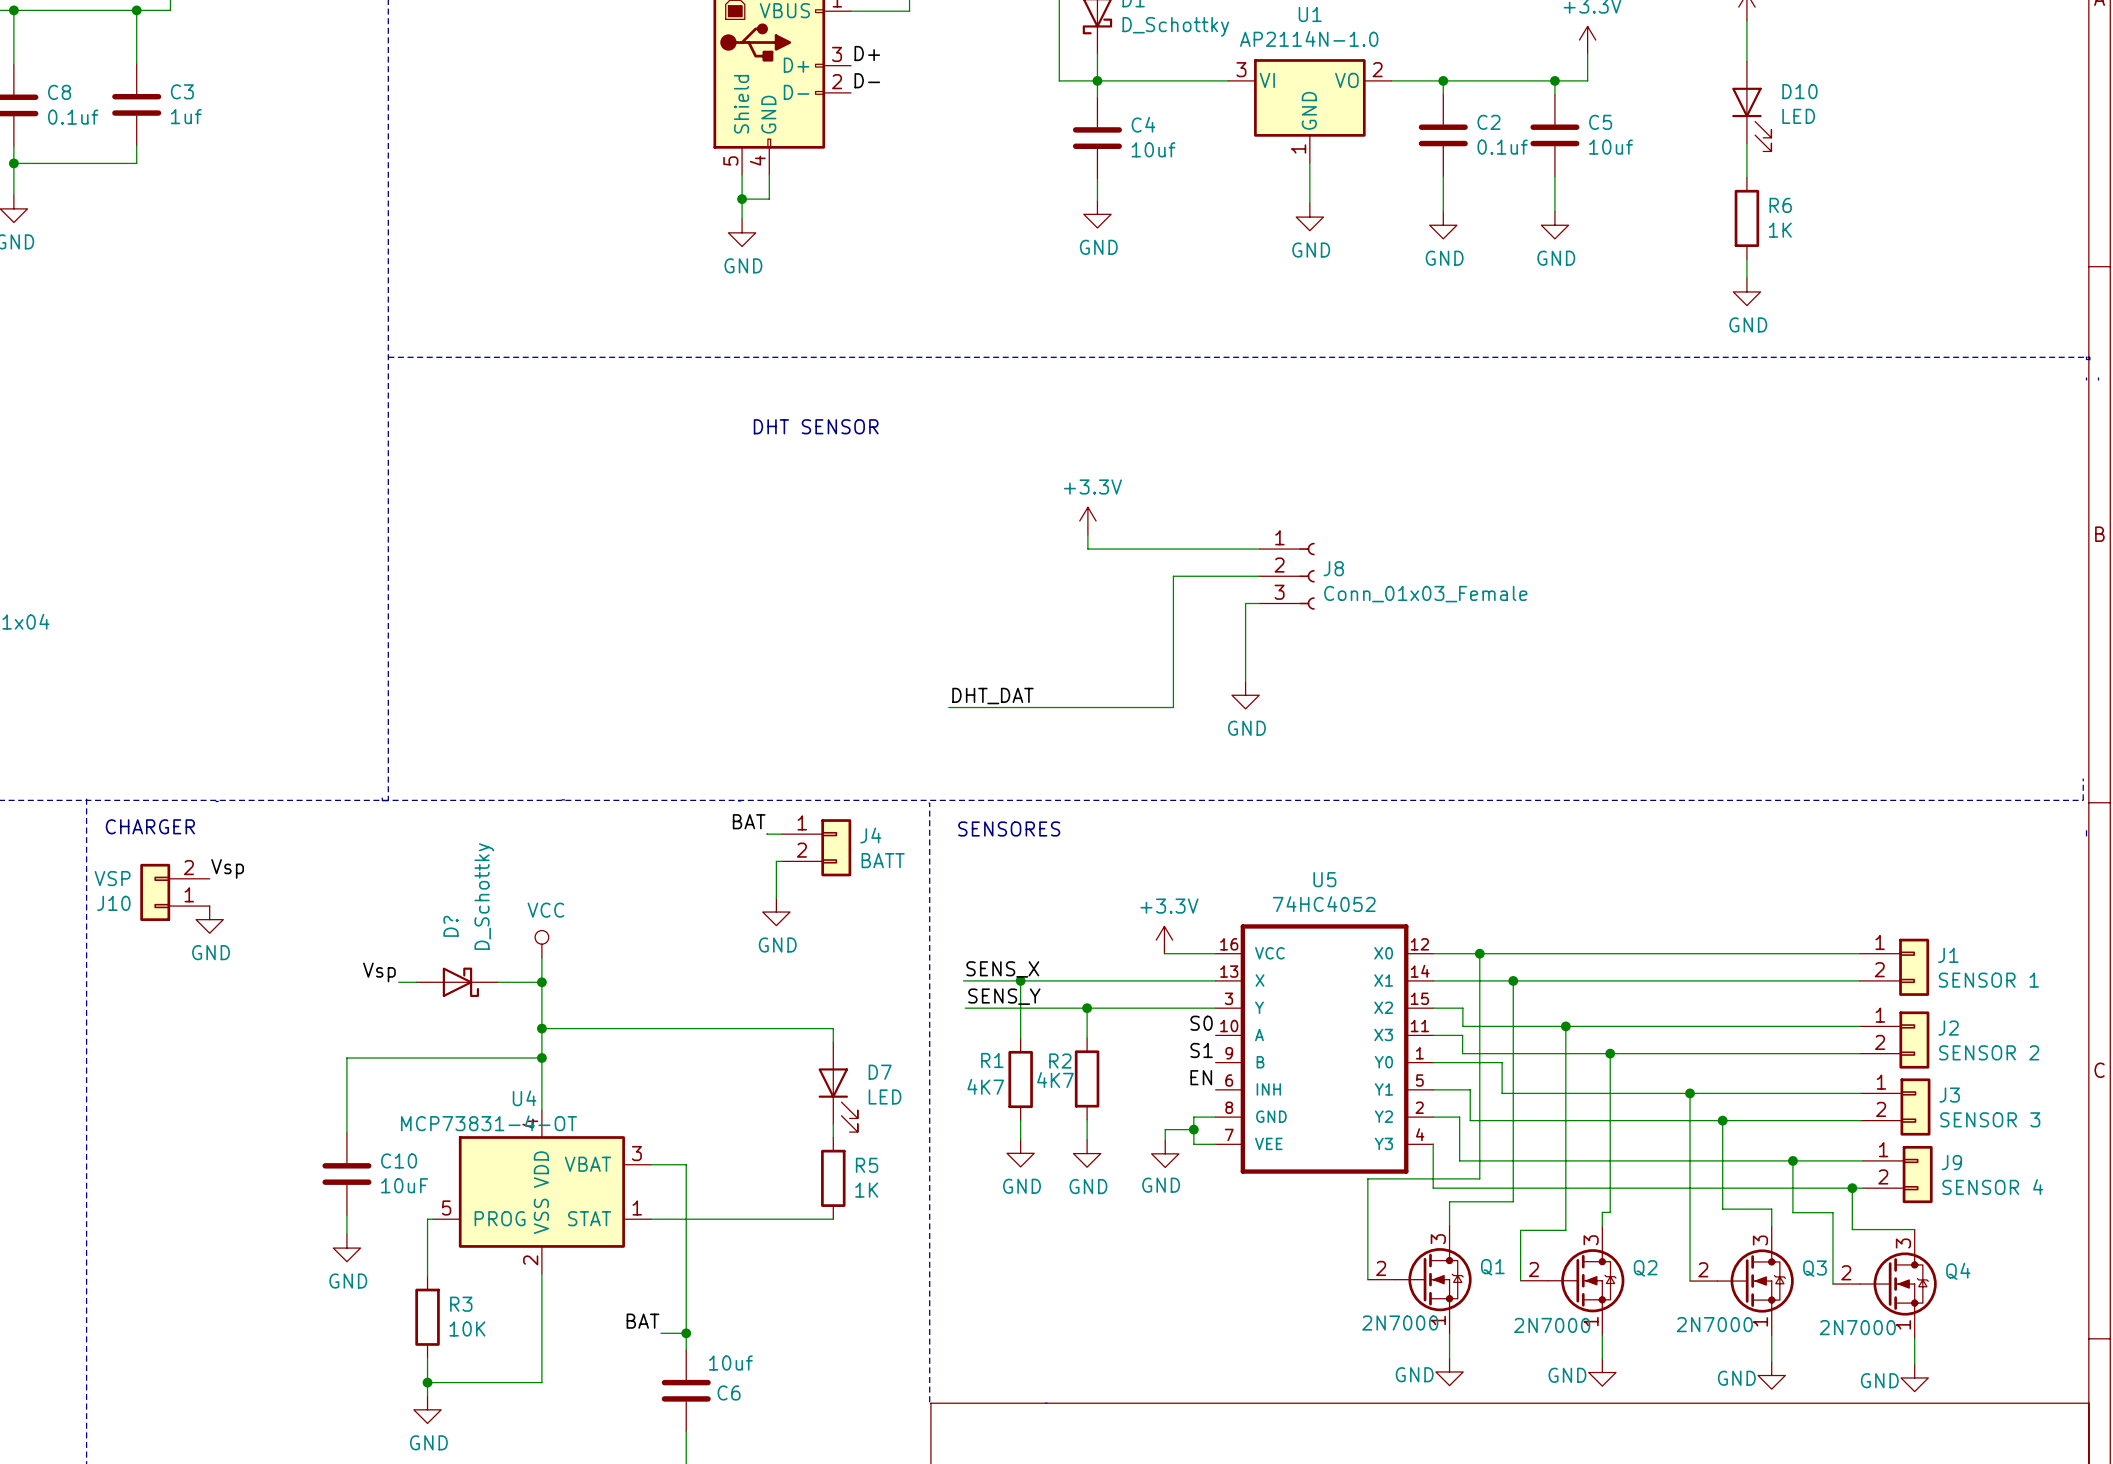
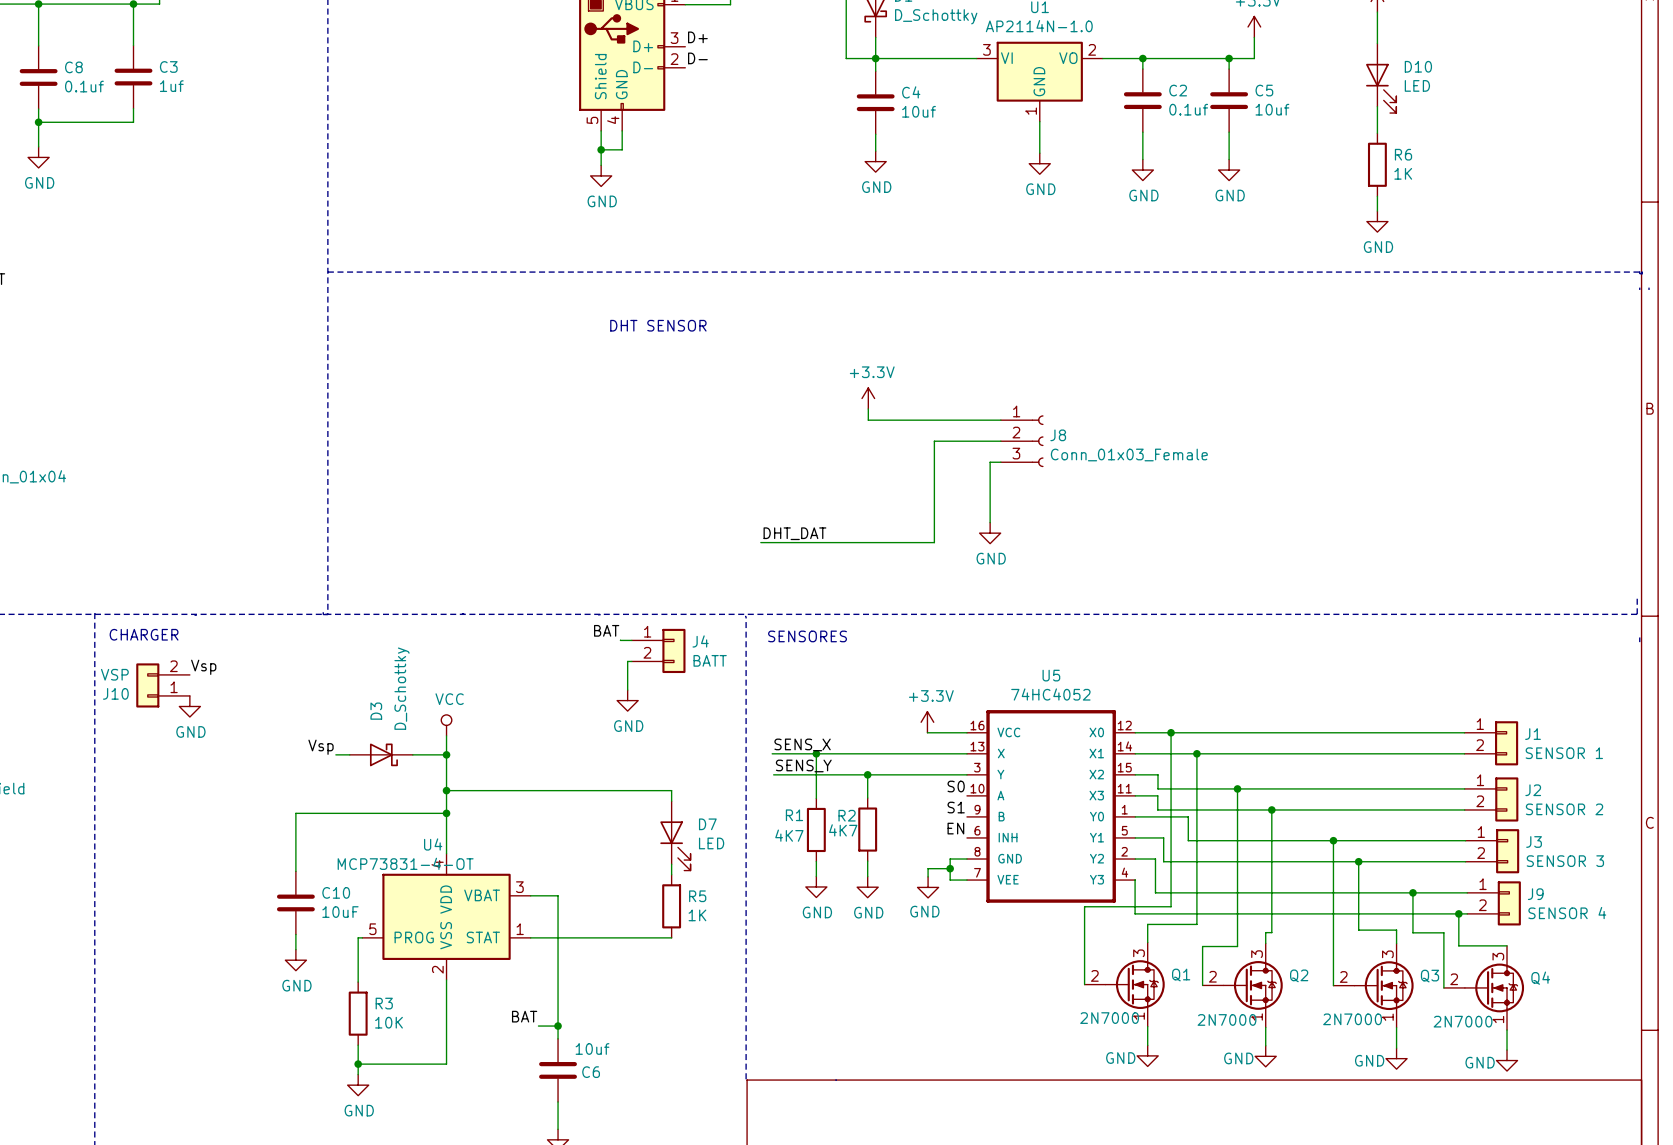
D? name: D? (450, 926) -> D3 (376, 711)

